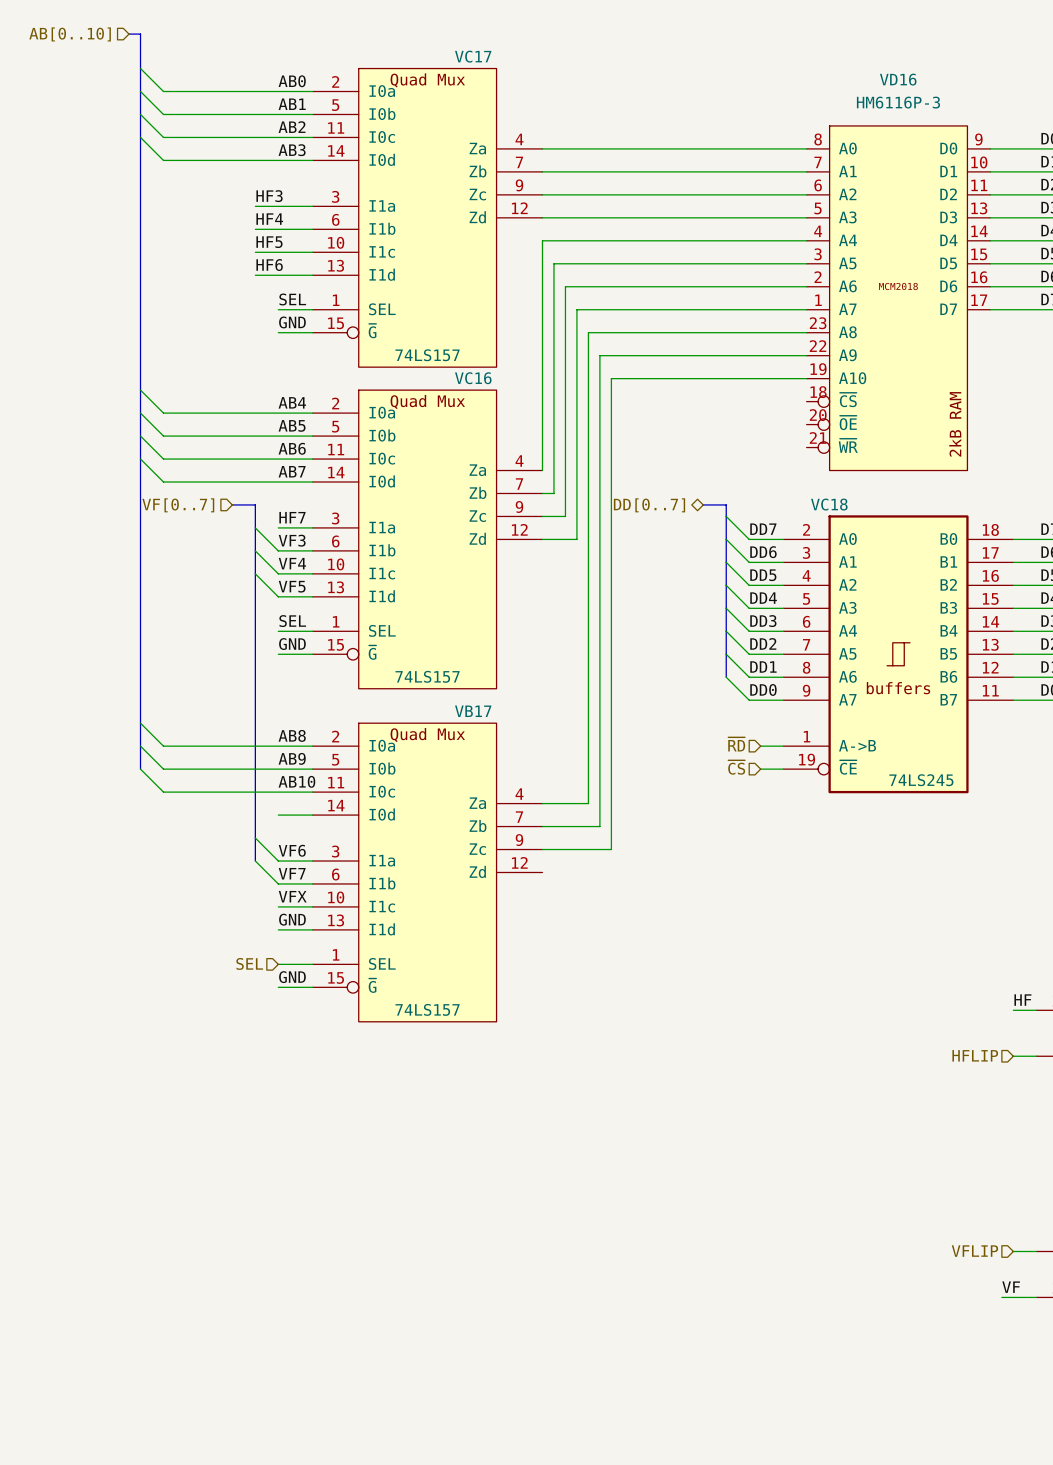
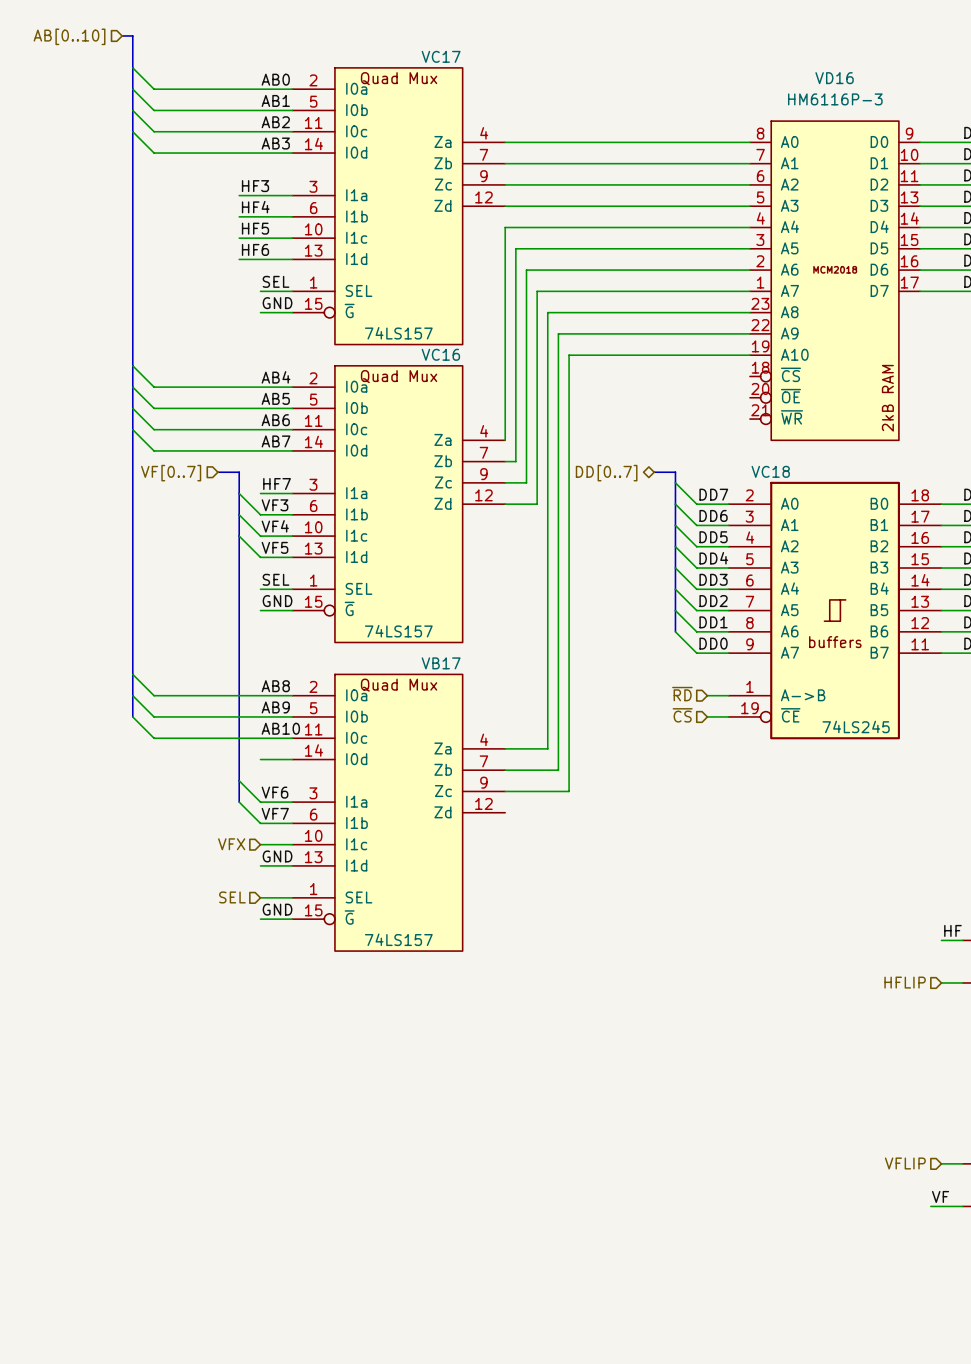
label: VFX (292, 896) -> none
hierarchical label: none -> VFX (231, 844)

